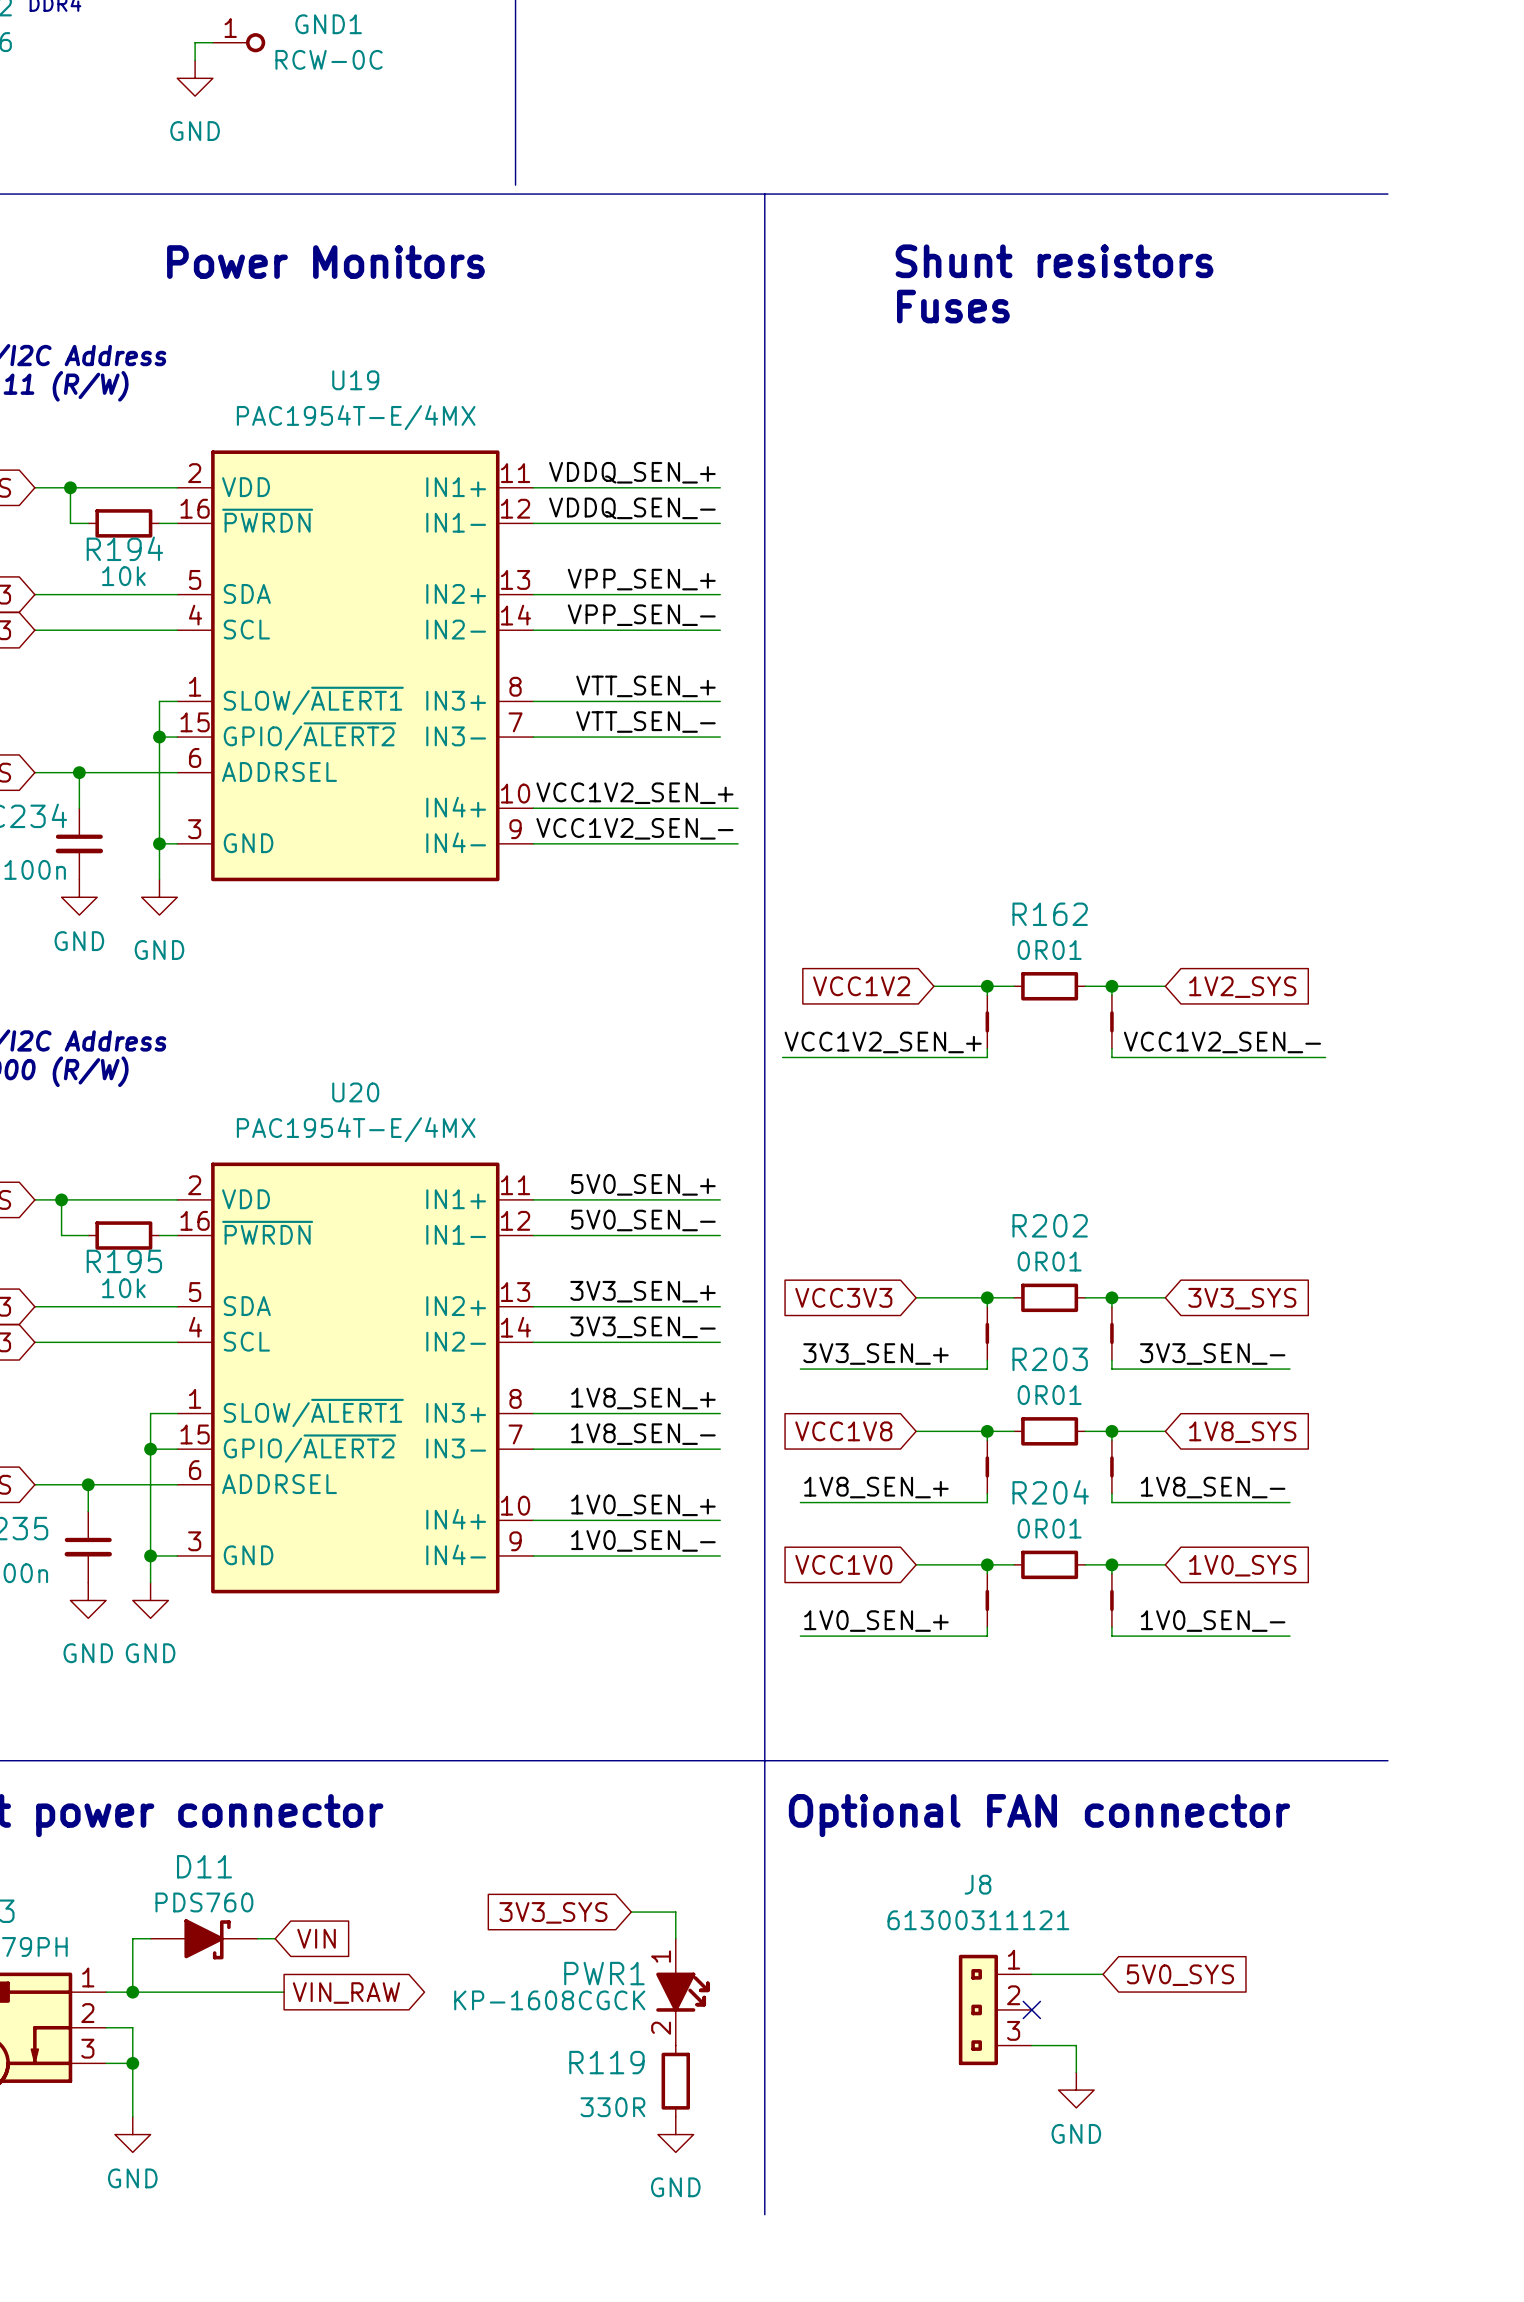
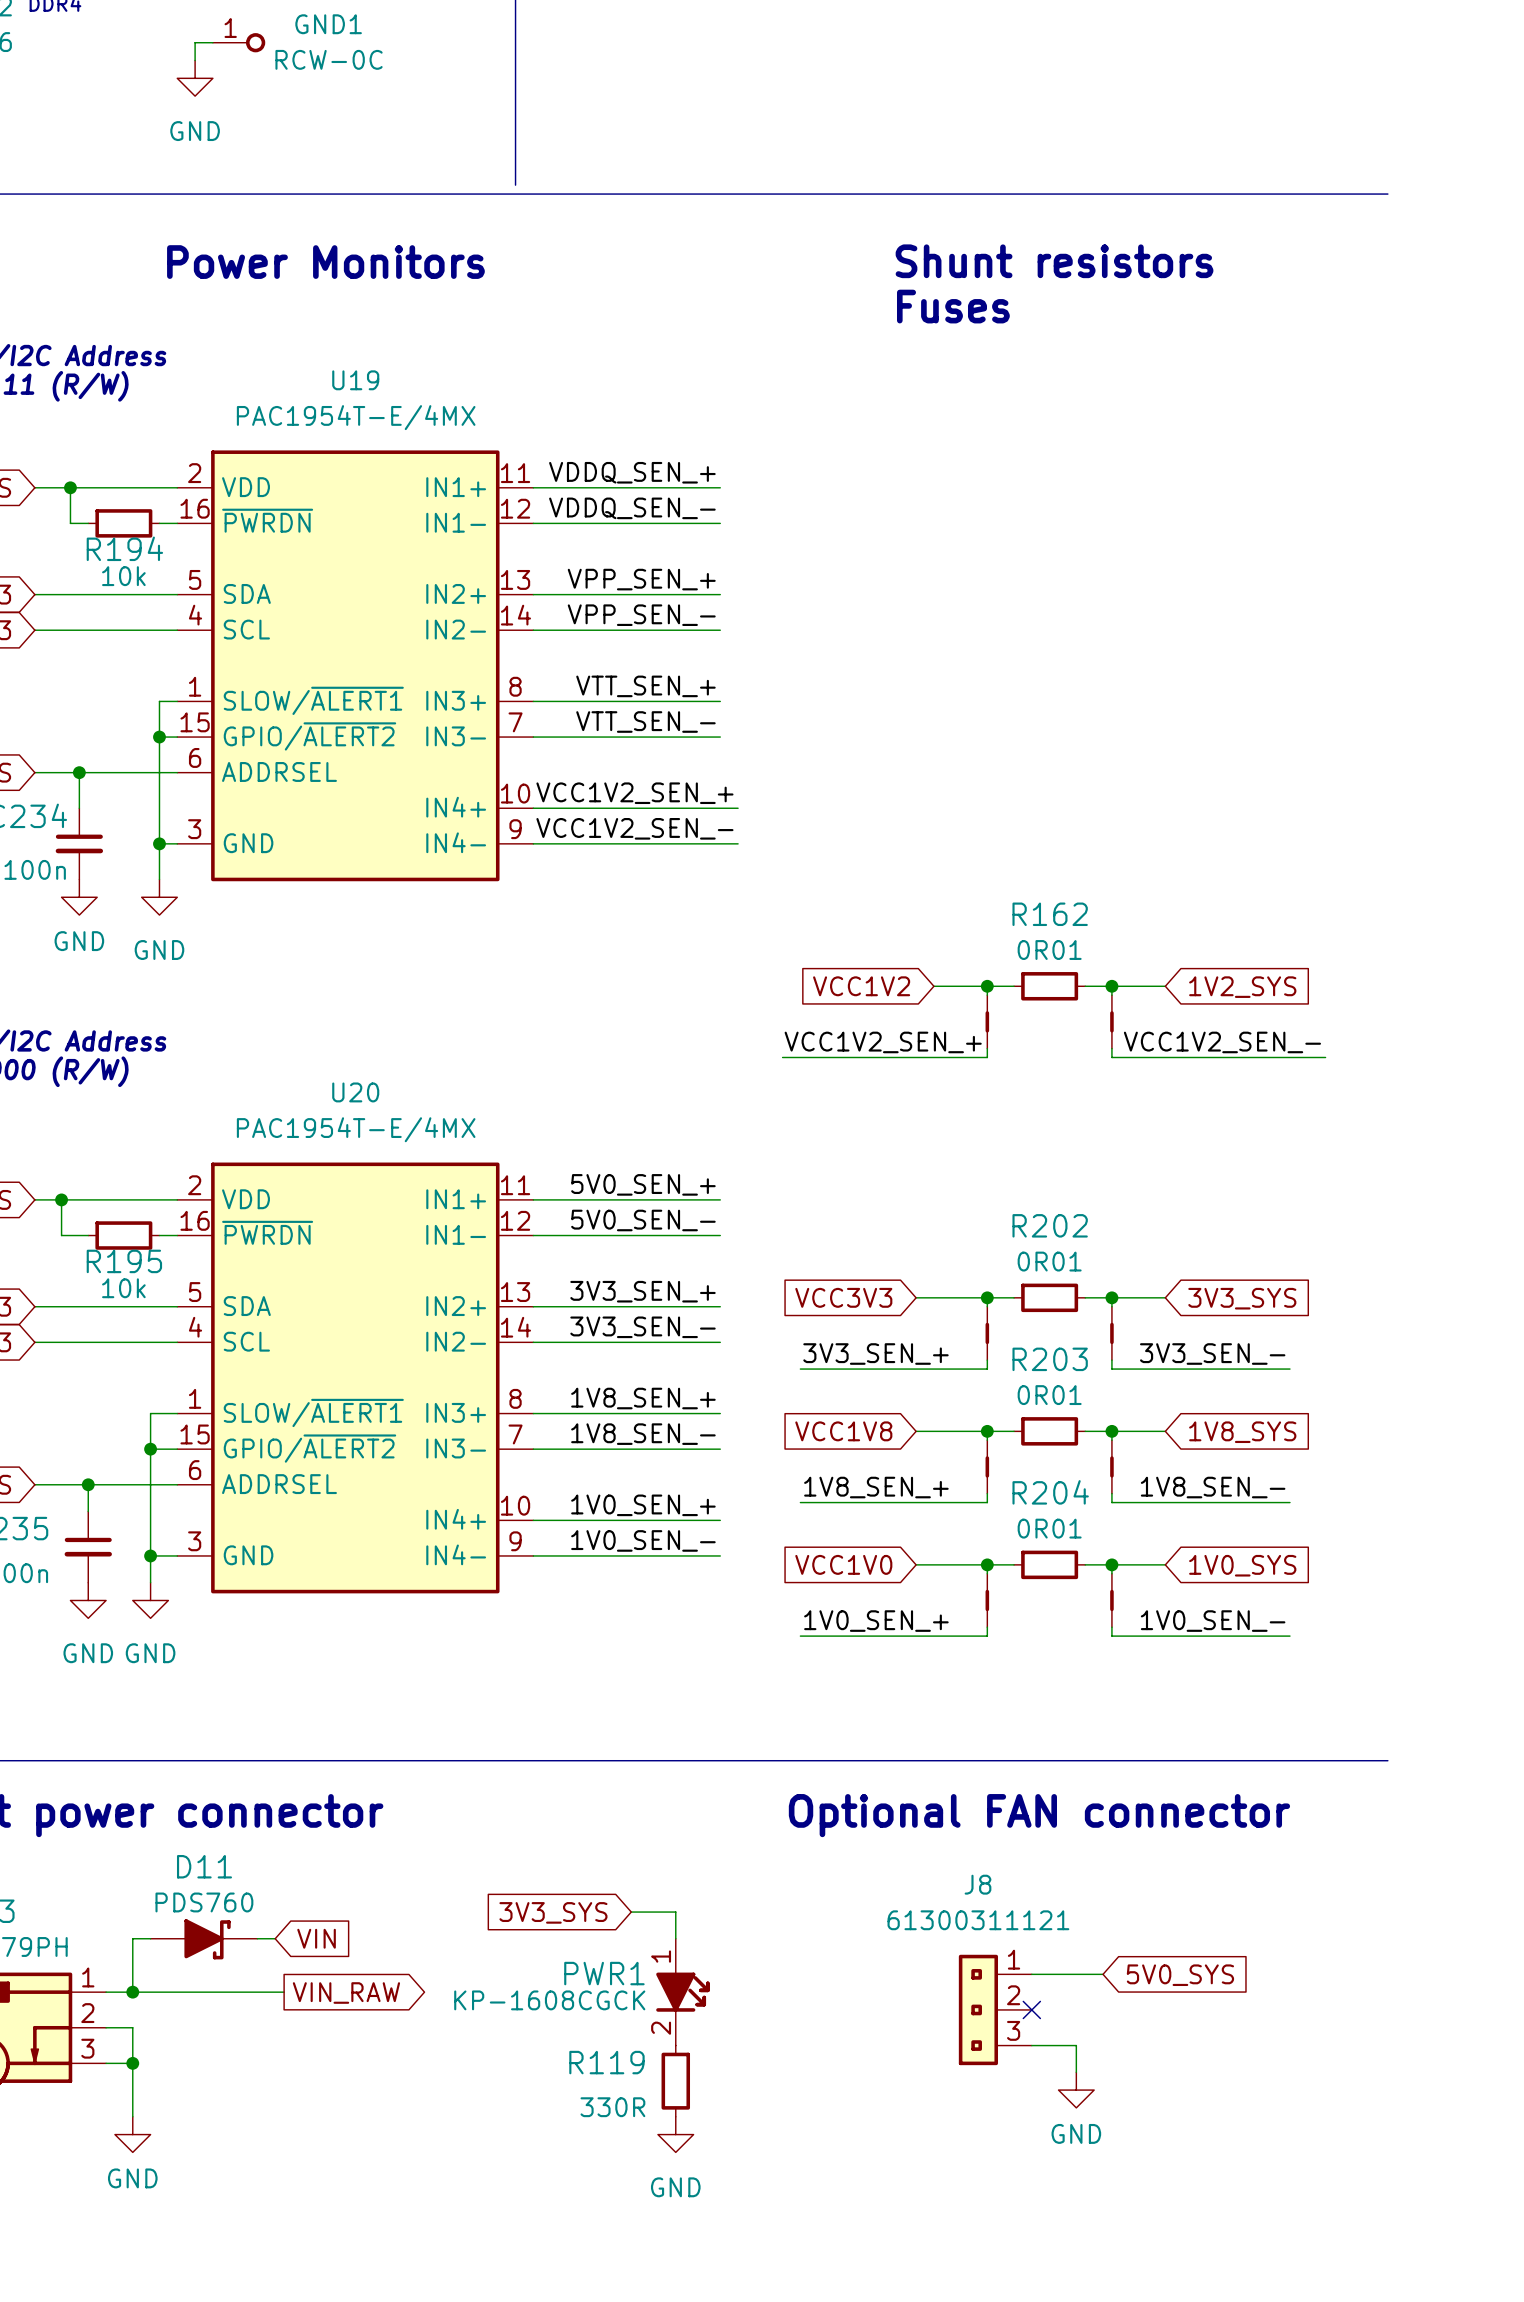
line: (764, 194) (764, 2214) -> none

